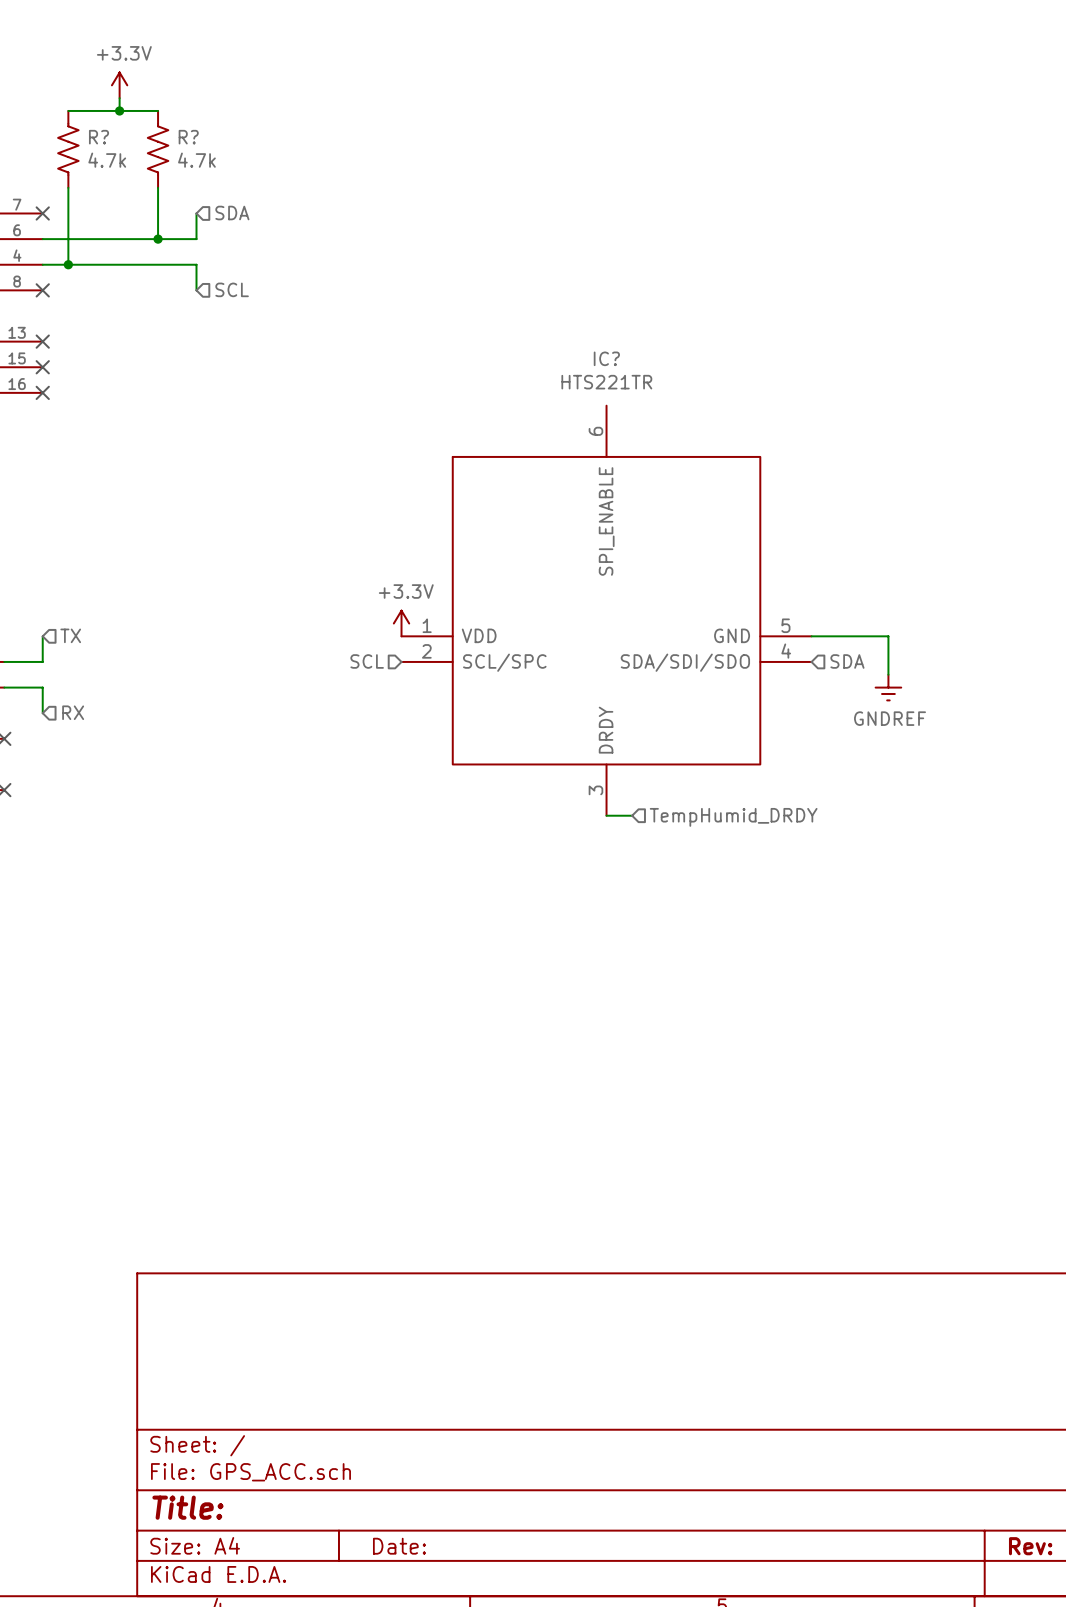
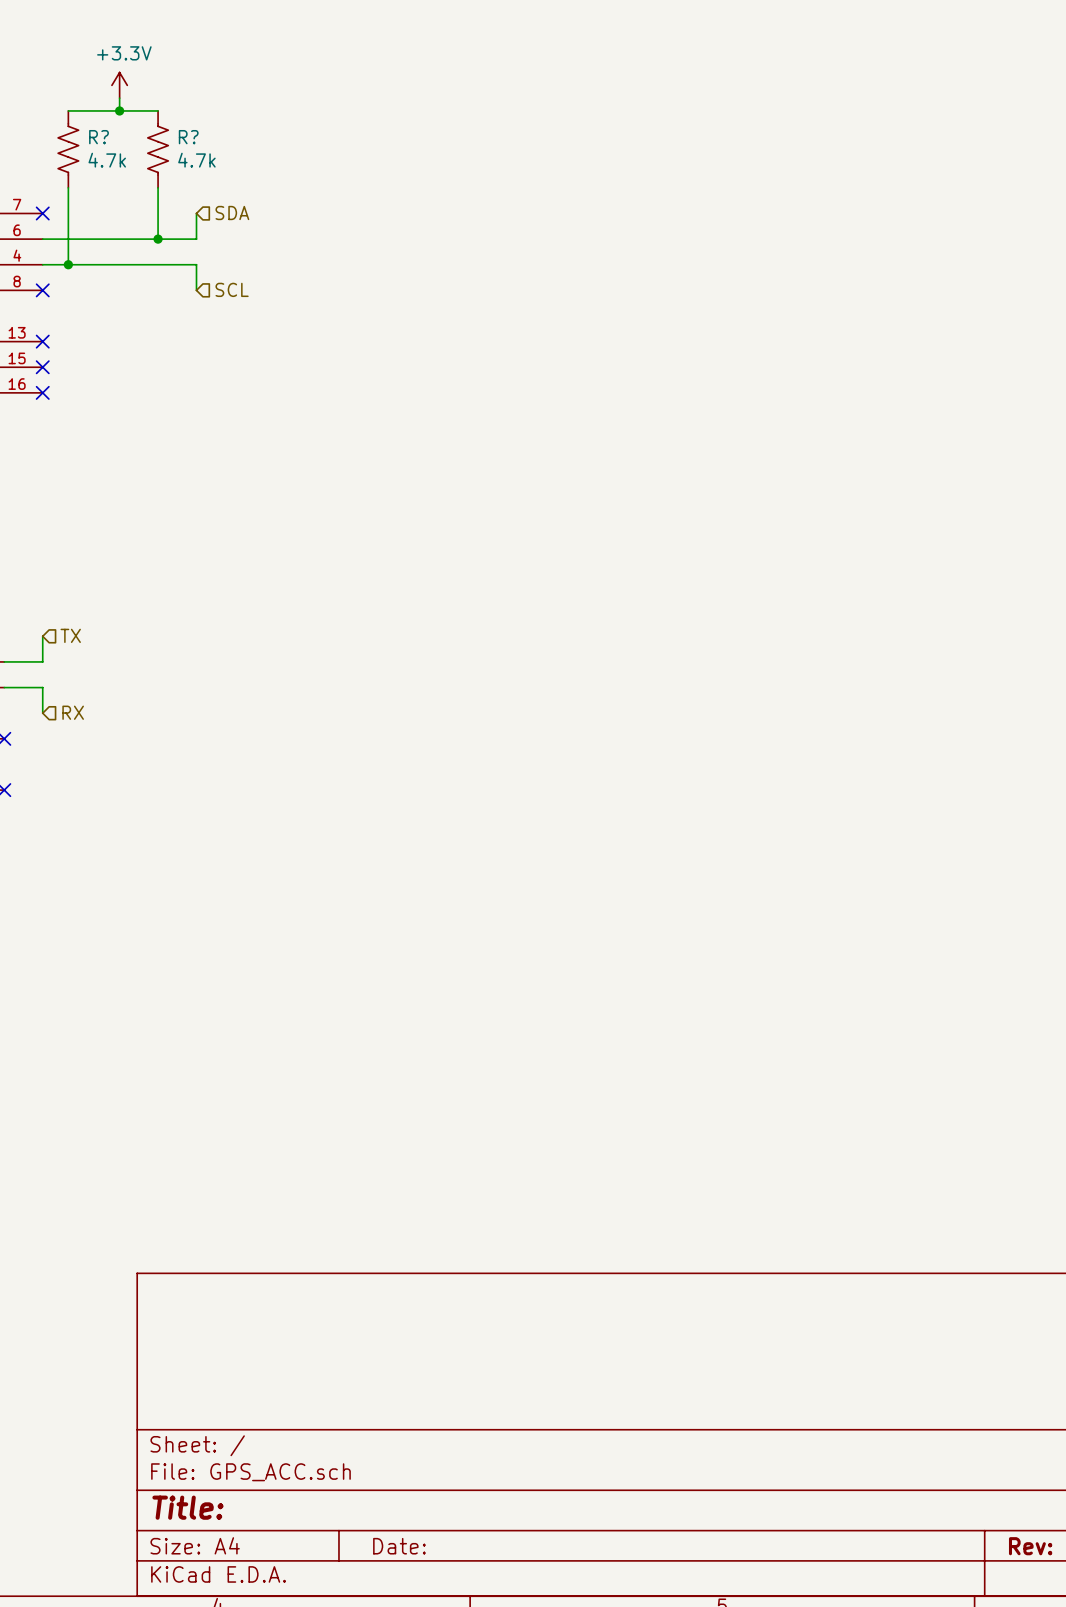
IC?: HTS221TR (606, 610) -> none
power symbol: +3.3V (401, 623) -> none
wire: (811, 636) (888, 636) (888, 674) -> none
hierarchical label: SCL (367, 661) -> none
hierarchical label: SDA (847, 661) -> none
power symbol: GNDREF (888, 687) -> none
wire: (606, 815) (632, 815) -> none
hierarchical label: TempHumid_DRDY (733, 817) -> none

